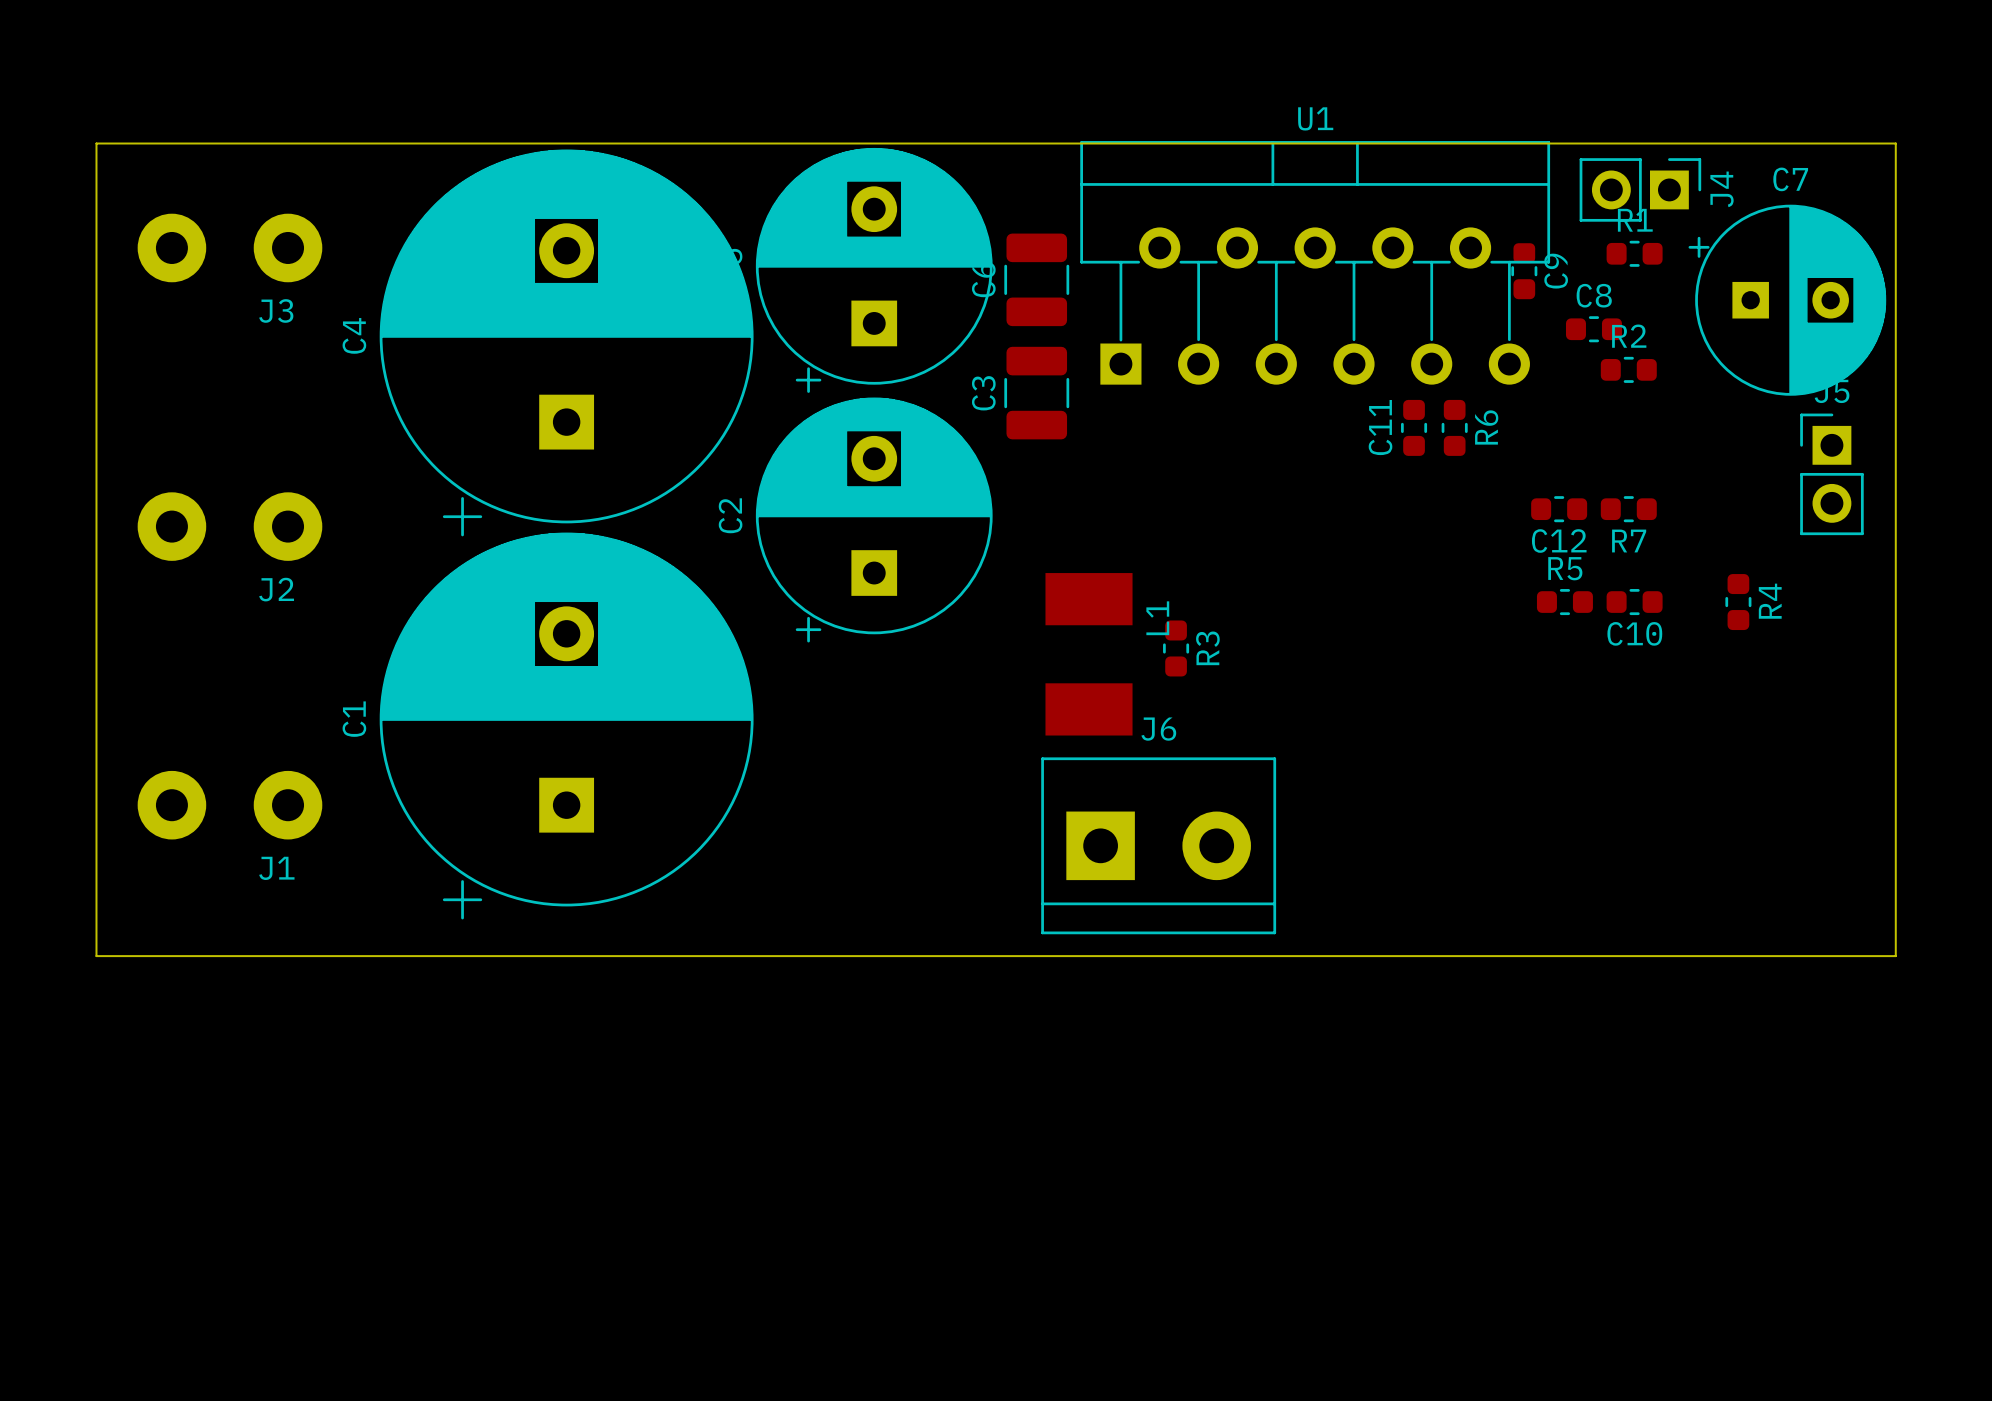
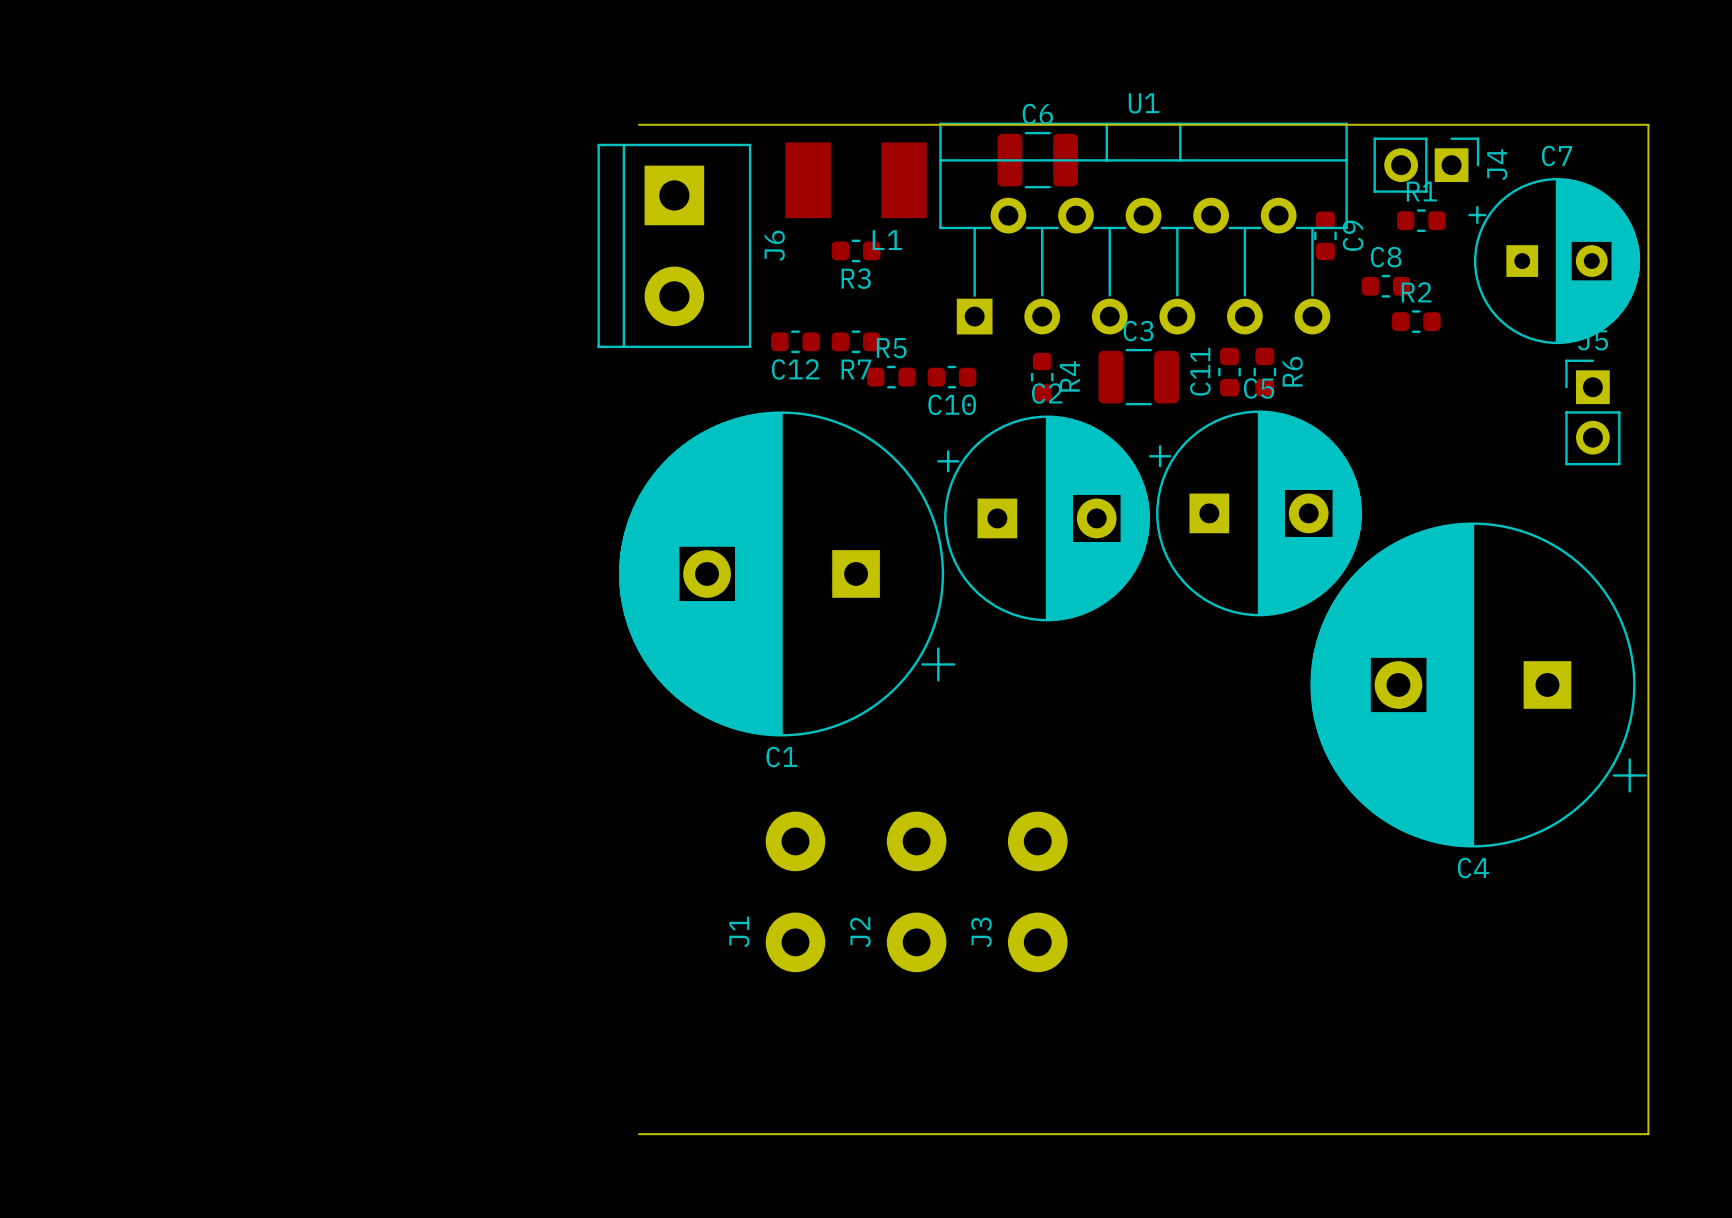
board edge: (734, 143) (96, 143) (96, 956) (1895, 956) -> (639, 1134) (1648, 1134) (1648, 831)
J3 rotation: 0° (229, 247) -> 90° clockwise (1037, 891)
J3 position: (229, 247) -> (1037, 891)
C5 rotation: 0° (874, 270) -> 90° clockwise (1255, 513)
C5 position: (874, 270) -> (1255, 513)
C6 rotation: 0° (1036, 279) -> 90° clockwise (1037, 160)
C6 position: (1036, 279) -> (1037, 160)
C4 rotation: 0° (566, 342) -> 90° counterclockwise (1478, 684)
C4 position: (566, 342) -> (1478, 684)
C3 rotation: 0° (1036, 393) -> 90° clockwise (1138, 377)
C3 position: (1036, 393) -> (1138, 377)
C12 position: (1559, 509) -> (795, 341)
R7 position: (1628, 509) -> (856, 341)
C2 rotation: 0° (874, 520) -> 90° clockwise (1043, 518)
C2 position: (874, 520) -> (1043, 518)
J2 rotation: 0° (229, 526) -> 90° clockwise (916, 891)
J2 position: (229, 526) -> (916, 891)
R5 position: (1564, 602) -> (891, 377)
C10 position: (1634, 602) -> (951, 377)
R4 position: (1738, 602) -> (1042, 377)
R3 rotation: 0° (1176, 648) -> 90° clockwise (856, 250)
R3 position: (1176, 648) -> (856, 250)
L1 rotation: 0° (1089, 654) -> 90° clockwise (856, 180)
L1 position: (1089, 654) -> (856, 180)
C1 rotation: 0° (566, 726) -> 90° counterclockwise (787, 573)
C1 position: (566, 726) -> (787, 573)
J1 rotation: 0° (229, 805) -> 90° clockwise (795, 891)
J1 position: (229, 805) -> (795, 891)
J6 rotation: 0° (1158, 845) -> 90° clockwise (674, 245)
J6 position: (1158, 845) -> (674, 245)

